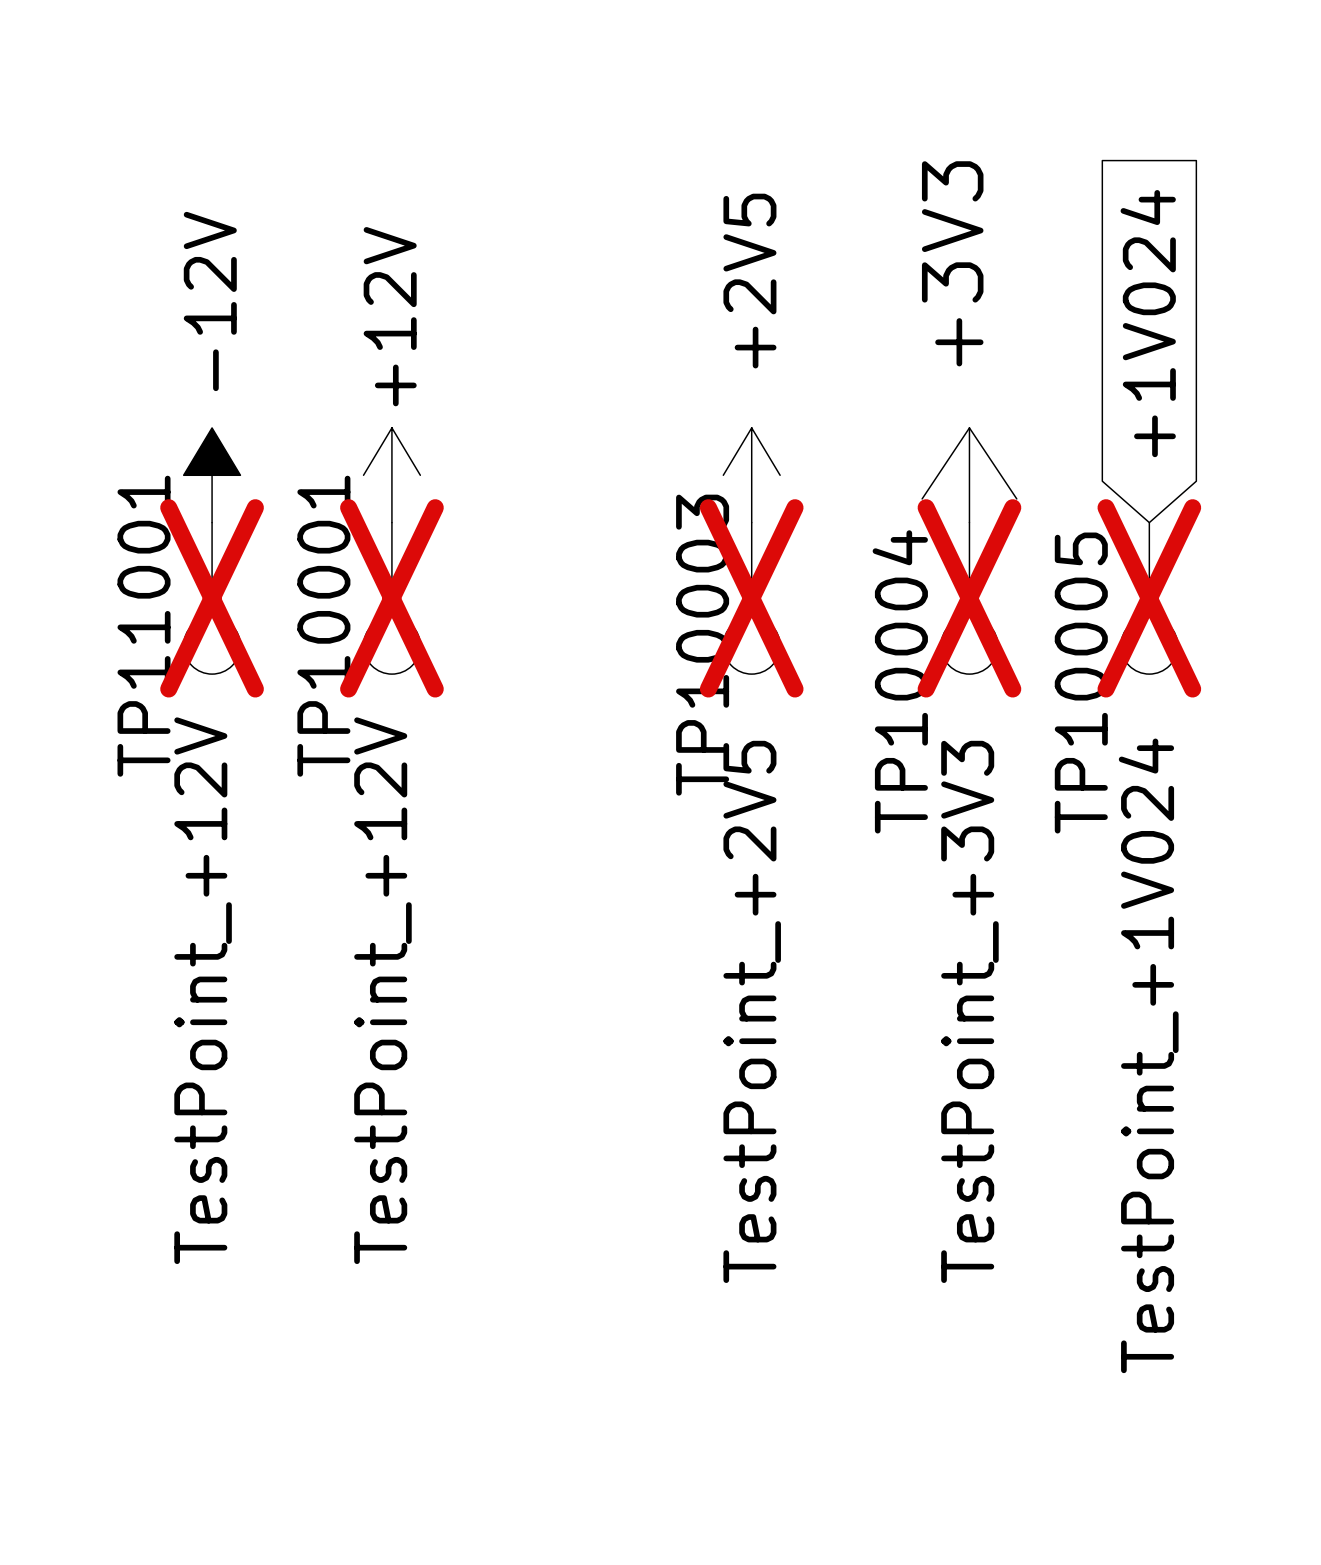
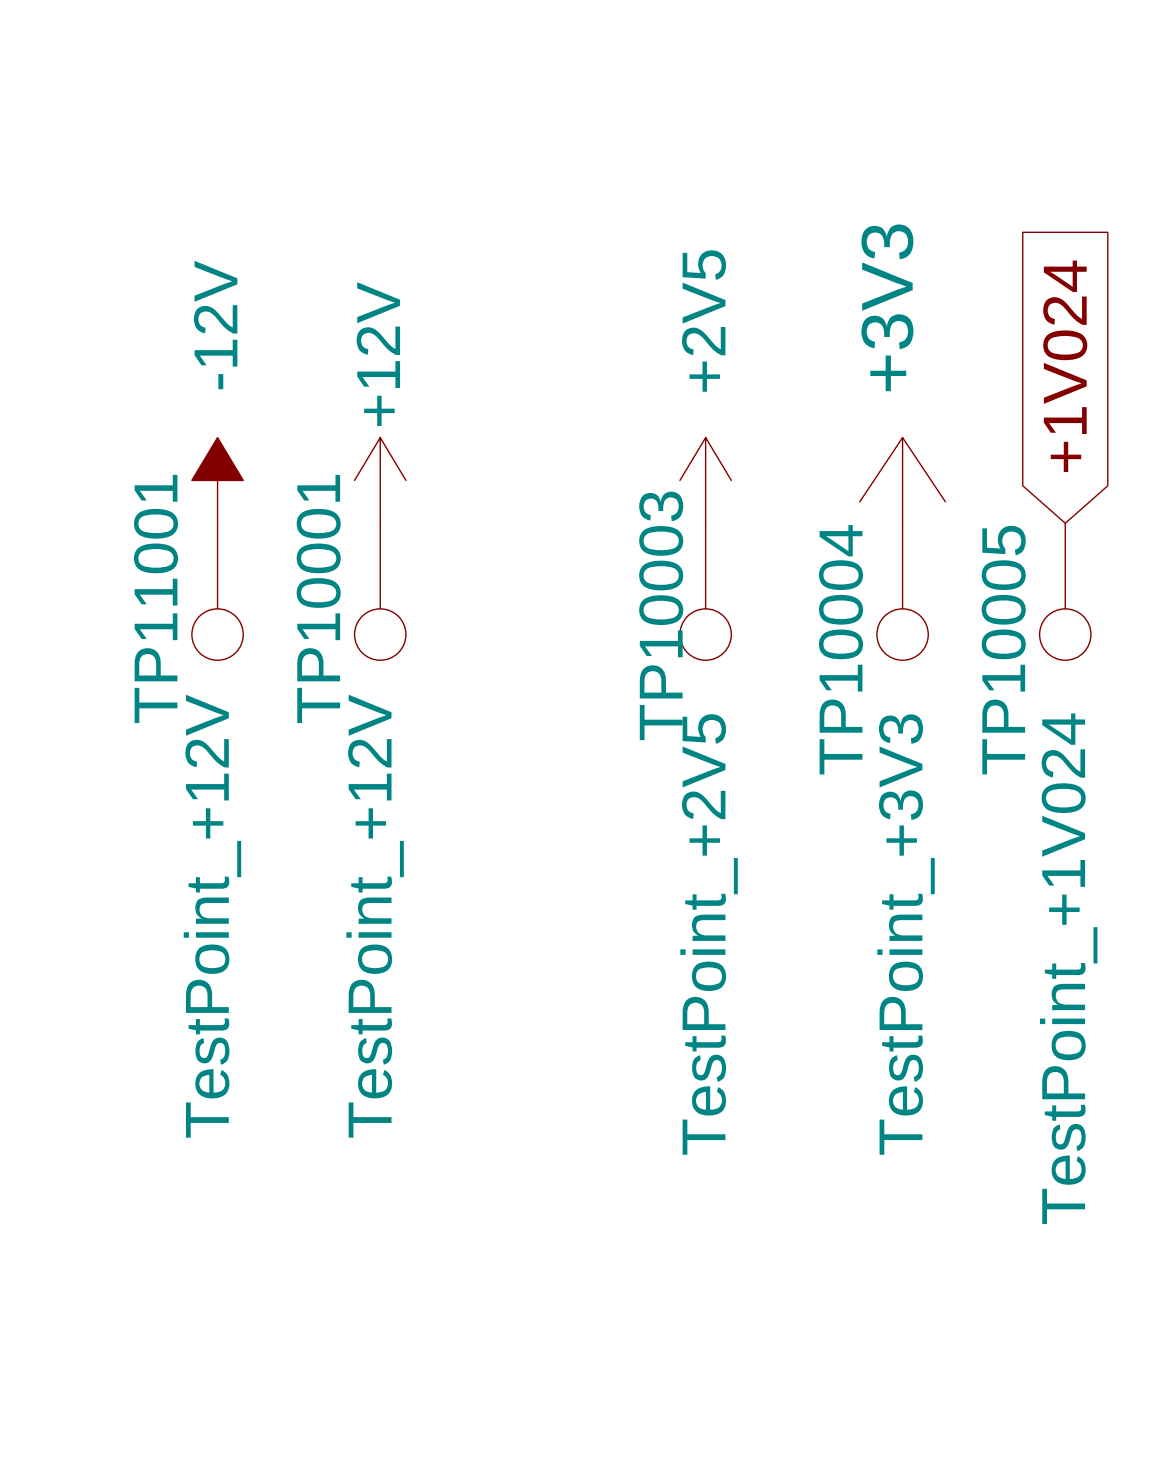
TP11001 do-not-place cross: (212, 598) -> none
TP10001 do-not-place cross: (391, 598) -> none
TP10003 do-not-place cross: (751, 598) -> none
TP10004 do-not-place cross: (969, 598) -> none
TP10005 do-not-place cross: (1149, 598) -> none

